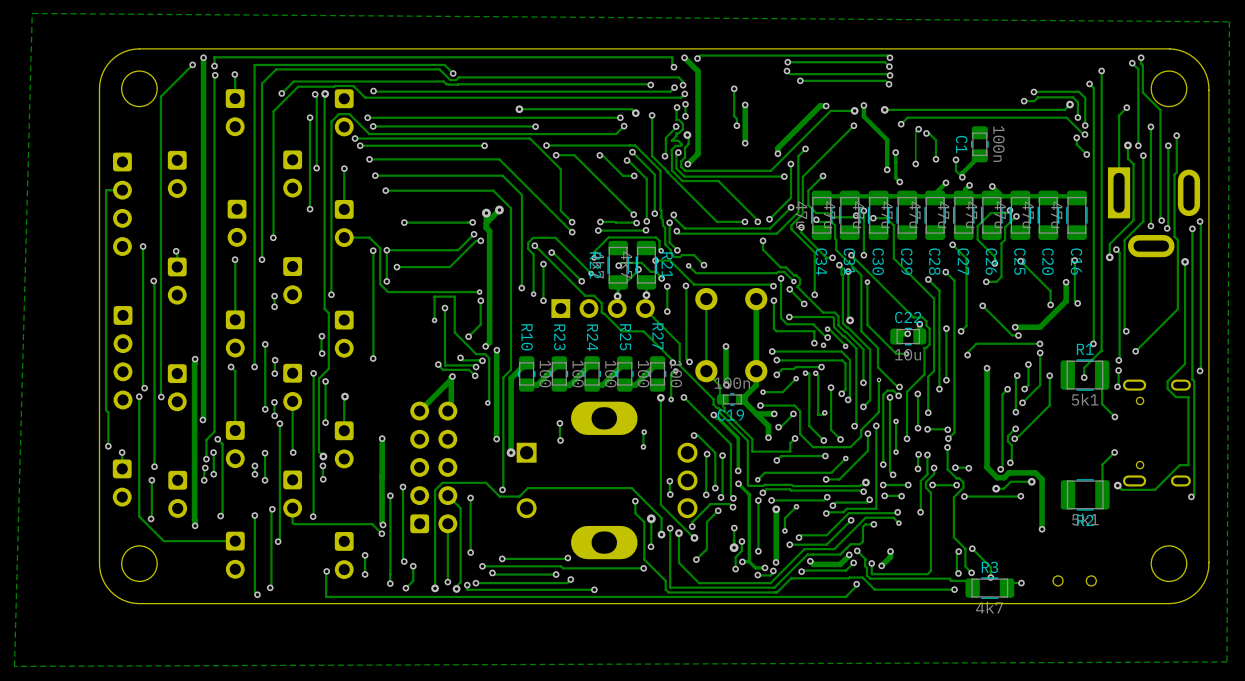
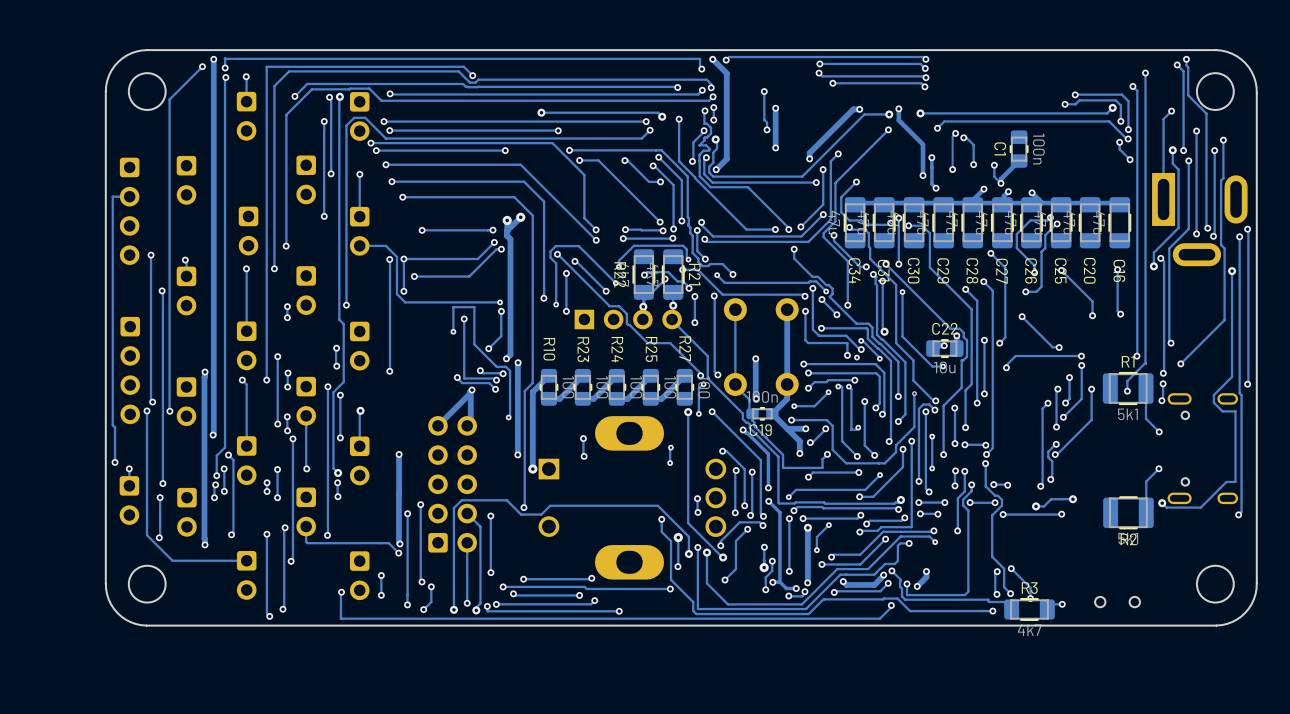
zone outline: (32, 13) (14, 666) (1227, 661) (1229, 21) (32, 13) -> none
track: (1066, 282) (1066, 301) (1040, 327) (1015, 327) -> none
via: (1066, 282) -> none
via: (1015, 327) -> none
track: (987, 368) (987, 467) (997, 477) (1004, 477) (1008, 472) (1035, 472) (1042, 479) (1042, 529) -> none
via: (987, 368) -> none
via: (1042, 529) -> none

